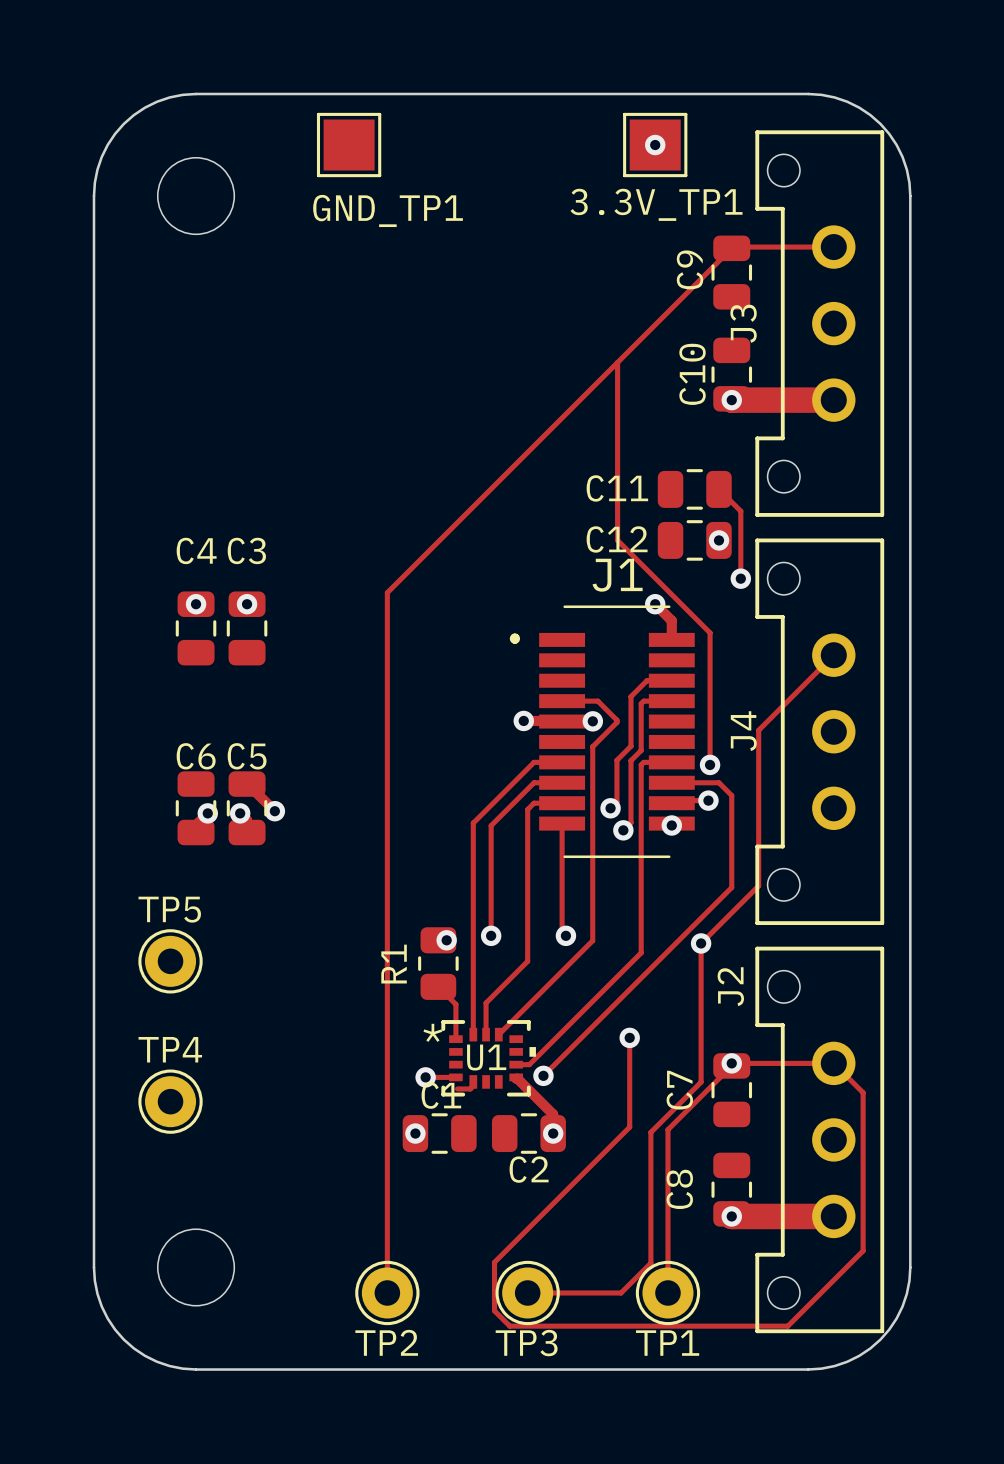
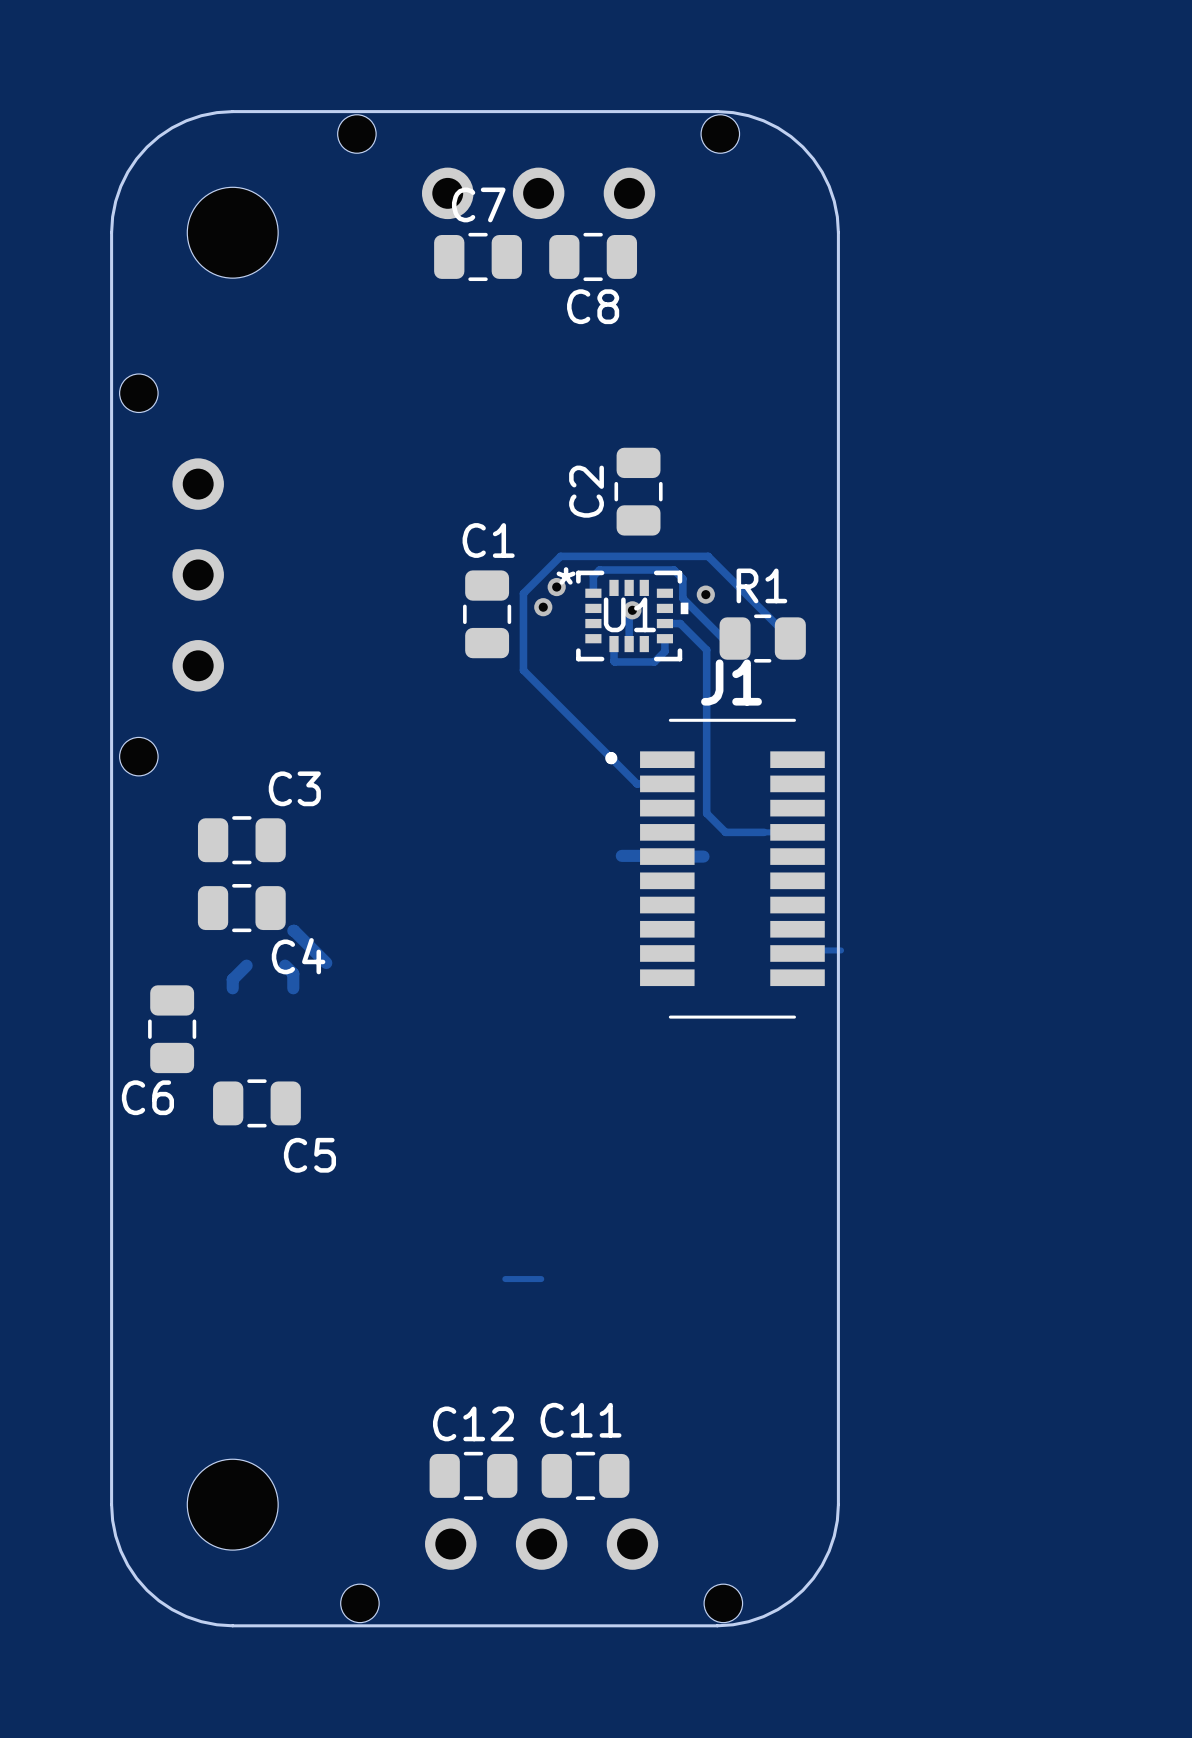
board edge: (604, 93) (808, 93) (834, 97) (859, 107) (880, 123) (889, 133) (896, 145) (906, 169) (910, 196) (910, 1267) (906, 1293) (896, 1318) (880, 1339) (859, 1355) (834, 1366) (808, 1369) (604, 1369) -> (717, 111) (748, 115) (763, 120) (777, 127) (802, 147) (813, 158) (829, 186) (834, 201) (838, 232) (837, 1520) (834, 1536) (822, 1565) (802, 1590) (777, 1609) (763, 1616) (748, 1621) (717, 1625)
part: none -> (538, 166)
GND_TP1: (349, 145) -> none
3.3V_TP1: (655, 145) -> none
via: (655, 145) -> none
track: (833, 247) (733, 247) (387, 592) (387, 1292) -> none
C9: (731, 272) -> none
J3: (819, 323) -> none
track: (617, 362) (617, 540) (710, 632) (710, 764) -> none
C10: (731, 374) -> none
track: (731, 398) (833, 400) -> none
via: (731, 400) -> none
part: none -> (171, 574)
C11 name position: C11 (617, 488) -> C11 (581, 1420)
C11 position: (694, 489) -> (585, 1475)
track: (719, 489) (740, 511) (740, 578) -> none
via: none -> (556, 587)
track: none -> (593, 593) (593, 576) (599, 569) (674, 569) (682, 578) (682, 598) (722, 638) (735, 638)
via: none -> (705, 594)
via: none -> (543, 607)
via: none -> (632, 610)
track: none -> (629, 613) (629, 644)
track: none -> (790, 638) (708, 556) (560, 556) (523, 593) (523, 670) (637, 783) (667, 783)
track: none -> (664, 638) (664, 651) (654, 661) (614, 661) (614, 644)
C12 name position: C12 (617, 539) -> C12 (473, 1423)
C12 position: (694, 540) -> (473, 1475)
via: (719, 540) -> none
C4 name position: C4 (196, 550) -> C4 (298, 956)
C3 name position: C3 (246, 550) -> C3 (294, 788)
via: (740, 578) -> none
via: (196, 604) -> none
via: (247, 604) -> none
track: (655, 604) (671, 620) (671, 639) -> none
via: (655, 604) -> none
C4 rotation: 0° (196, 628) -> 90° clockwise (241, 908)
C4 position: (196, 628) -> (241, 908)
C3 rotation: 0° (247, 628) -> 90° clockwise (241, 840)
C3 position: (247, 628) -> (241, 840)
track: (833, 655) (758, 730) (758, 885) (701, 943) (701, 1082) (650, 1132) (650, 1263) (621, 1292) (527, 1292) -> none
track: (671, 680) (646, 680) (630, 696) (630, 746) (616, 760) (616, 801) (610, 808) -> none
track: (562, 701) (597, 701) (616, 720) (616, 722) (592, 746) (592, 940) (498, 1034) -> none
track: (643, 701) (641, 703) (641, 750) (630, 760) (630, 822) (623, 830) -> (764, 832) (725, 832) (706, 813) (706, 649) (680, 623) (664, 623)
via: (523, 720) -> none
via: (592, 721) -> none
J4: (819, 731) -> none
C6 name position: C6 (196, 756) -> C6 (147, 1097)
track: (562, 762) (534, 762) (473, 823) (473, 1034) -> none
track: (671, 762) (643, 762) (641, 764) (641, 952) (529, 1064) (516, 1064) -> none
via: (710, 764) -> none
track: (562, 782) (534, 782) (491, 825) (491, 935) -> none
track: (671, 782) (719, 782) (731, 795) (731, 887) (543, 1075) -> none
via: (708, 800) -> none
track: (562, 803) (534, 803) (527, 809) (527, 961) (486, 1002) (486, 1034) -> none
C6 position: (196, 808) -> (172, 1029)
C5 rotation: 0° (247, 808) -> 90° clockwise (256, 1103)
C5 position: (247, 808) -> (256, 1103)
via: (610, 808) -> none
via: (274, 811) -> none
via: (207, 813) -> none
via: (240, 813) -> none
track: (562, 823) (562, 932) (565, 935) -> none
via: (671, 825) -> none
via: (623, 830) -> none
via: (491, 935) -> none
via: (565, 935) -> none
via: (446, 940) -> none
via: (701, 943) -> none
TP5: (170, 961) -> none
R1 rotation: 0° (438, 963) -> 90° clockwise (762, 638)
R1 position: (438, 963) -> (762, 638)
track: (438, 986) (455, 1004) (455, 1039) -> none
track: (629, 1037) (629, 1127) (494, 1262) (494, 1310) (509, 1326) (787, 1326) (863, 1250) (863, 1092) (833, 1063) (734, 1063) (667, 1129) (667, 1292) -> none
via: (629, 1037) -> none
U1 position: (488, 1058) -> (632, 615)
via: (731, 1063) -> none
via: (543, 1075) -> none
via: (425, 1077) -> none
track: (516, 1078) (553, 1114) (553, 1133) -> none
track: (473, 1081) (473, 1086) (470, 1088) (457, 1088) -> none
C7 rotation: 0° (731, 1090) -> 90° clockwise (478, 256)
C7 position: (731, 1090) -> (478, 256)
TP4: (170, 1101) -> none
via: (415, 1133) -> none
C1 rotation: 0° (439, 1133) -> 90° clockwise (487, 614)
C1 position: (439, 1133) -> (487, 614)
C2 rotation: 0° (528, 1133) -> 90° clockwise (638, 491)
C2 position: (528, 1133) -> (638, 491)
via: (553, 1133) -> none
J2: (819, 1139) -> none
C8 name position: C8 (679, 1189) -> C8 (593, 306)
C8 rotation: 0° (731, 1189) -> 90° clockwise (593, 256)
C8 position: (731, 1189) -> (593, 256)
track: (731, 1213) (731, 1216) (833, 1216) -> none
via: (731, 1216) -> none
TP2: (387, 1292) -> none
TP3: (527, 1292) -> none
TP1: (667, 1292) -> none
part: none -> (541, 1570)

